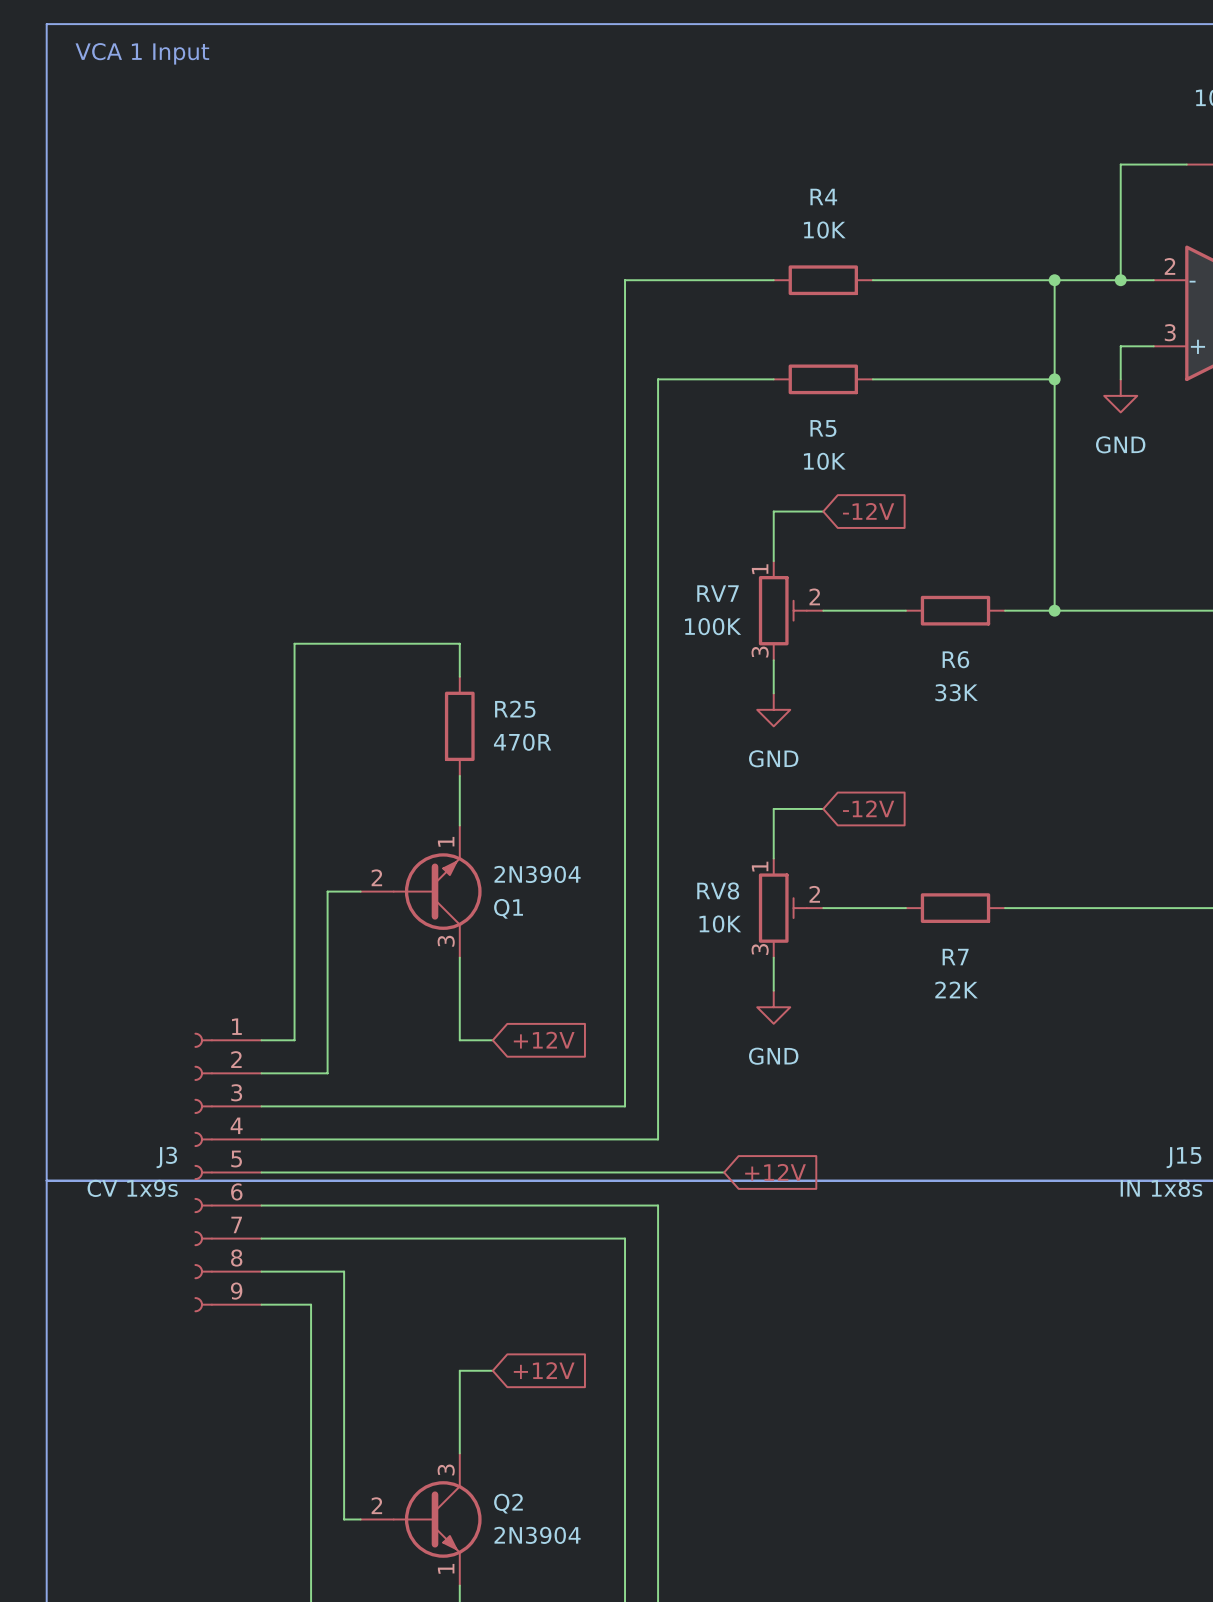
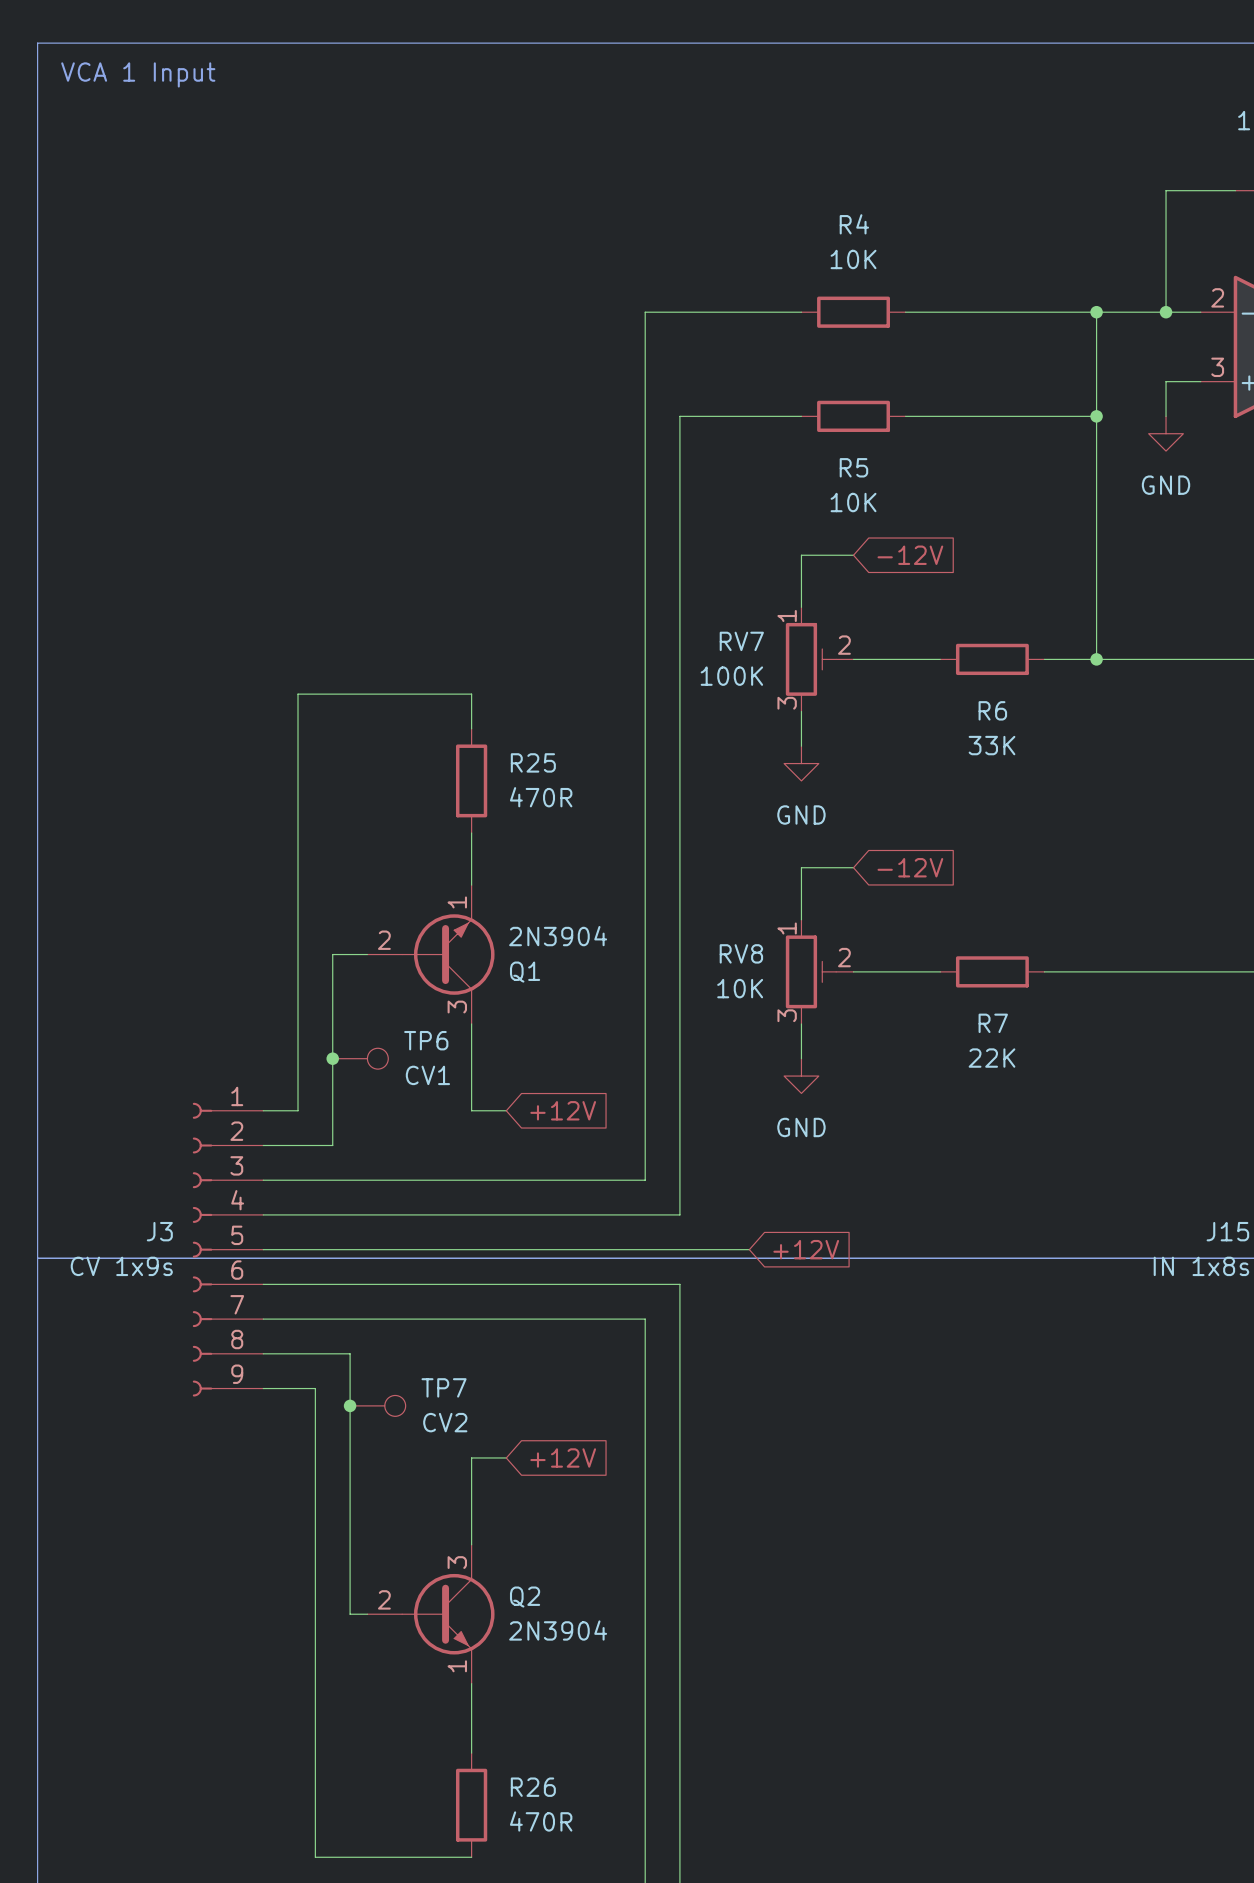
junction: none -> (332, 1058)
TP6: none -> CV1 (360, 1058)
junction: none -> (350, 1405)
TP7: none -> CV2 (377, 1405)

